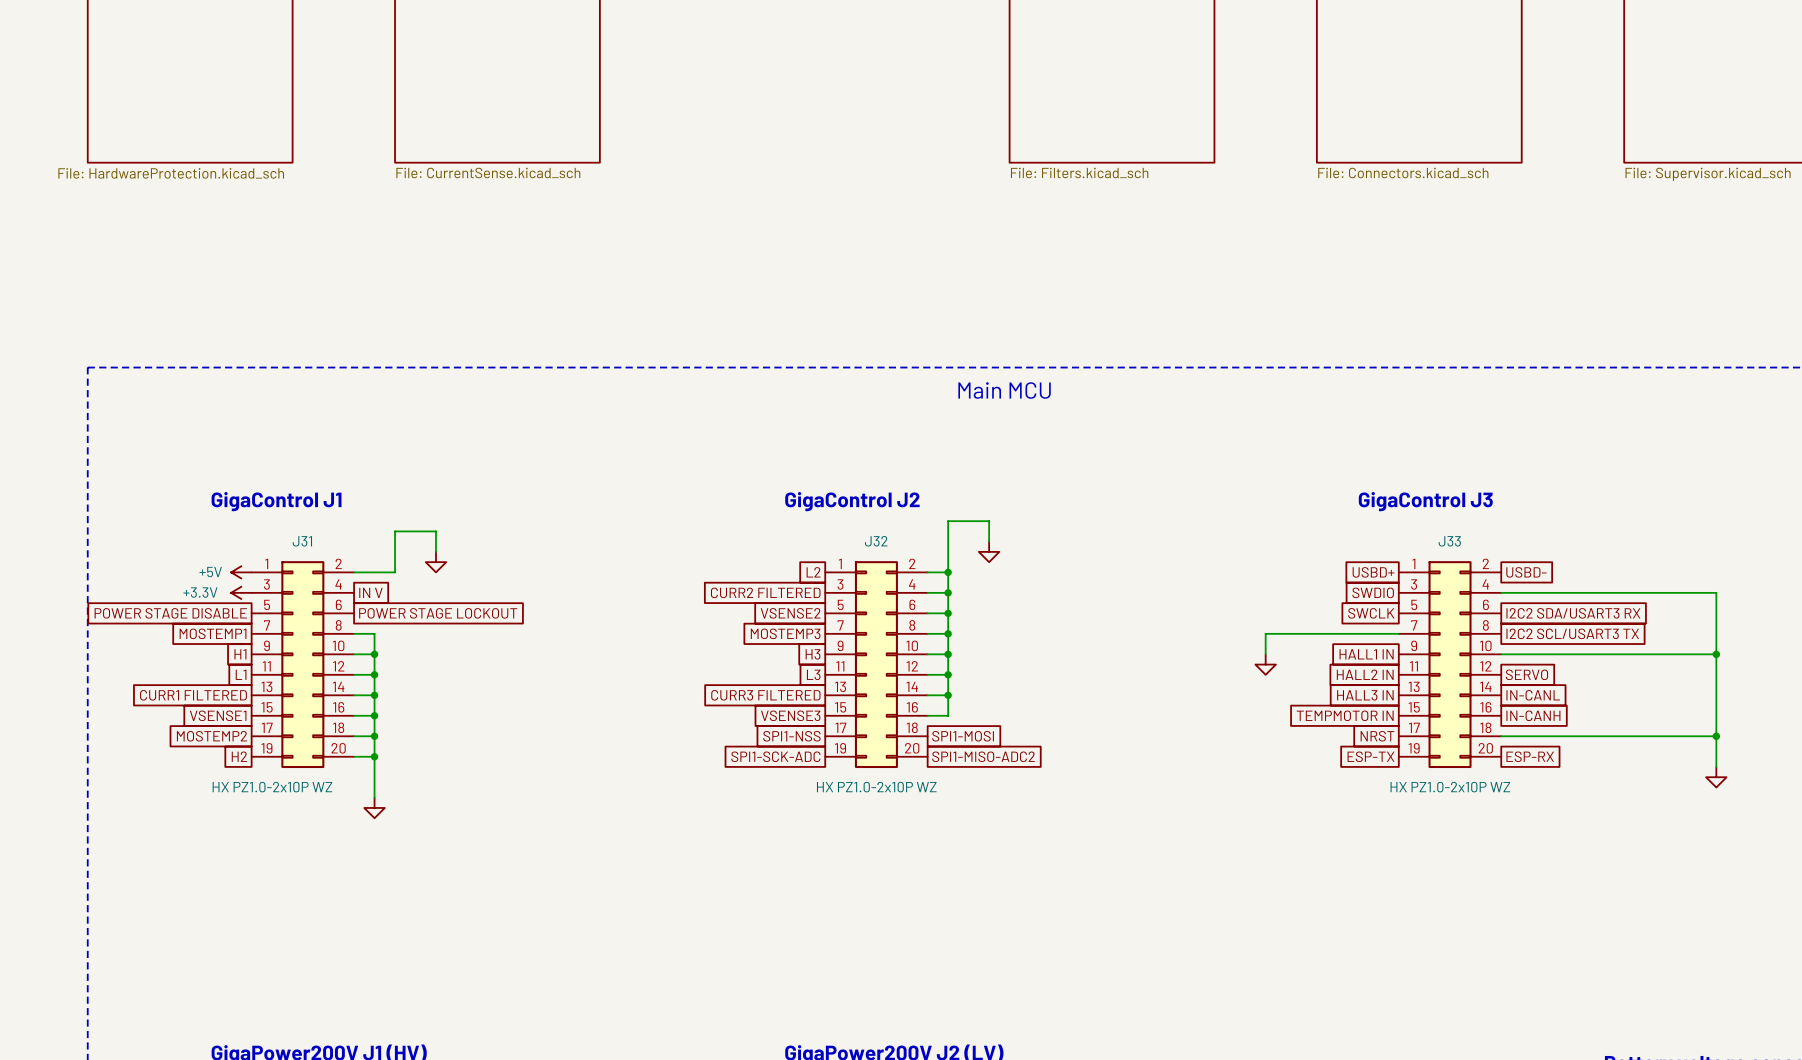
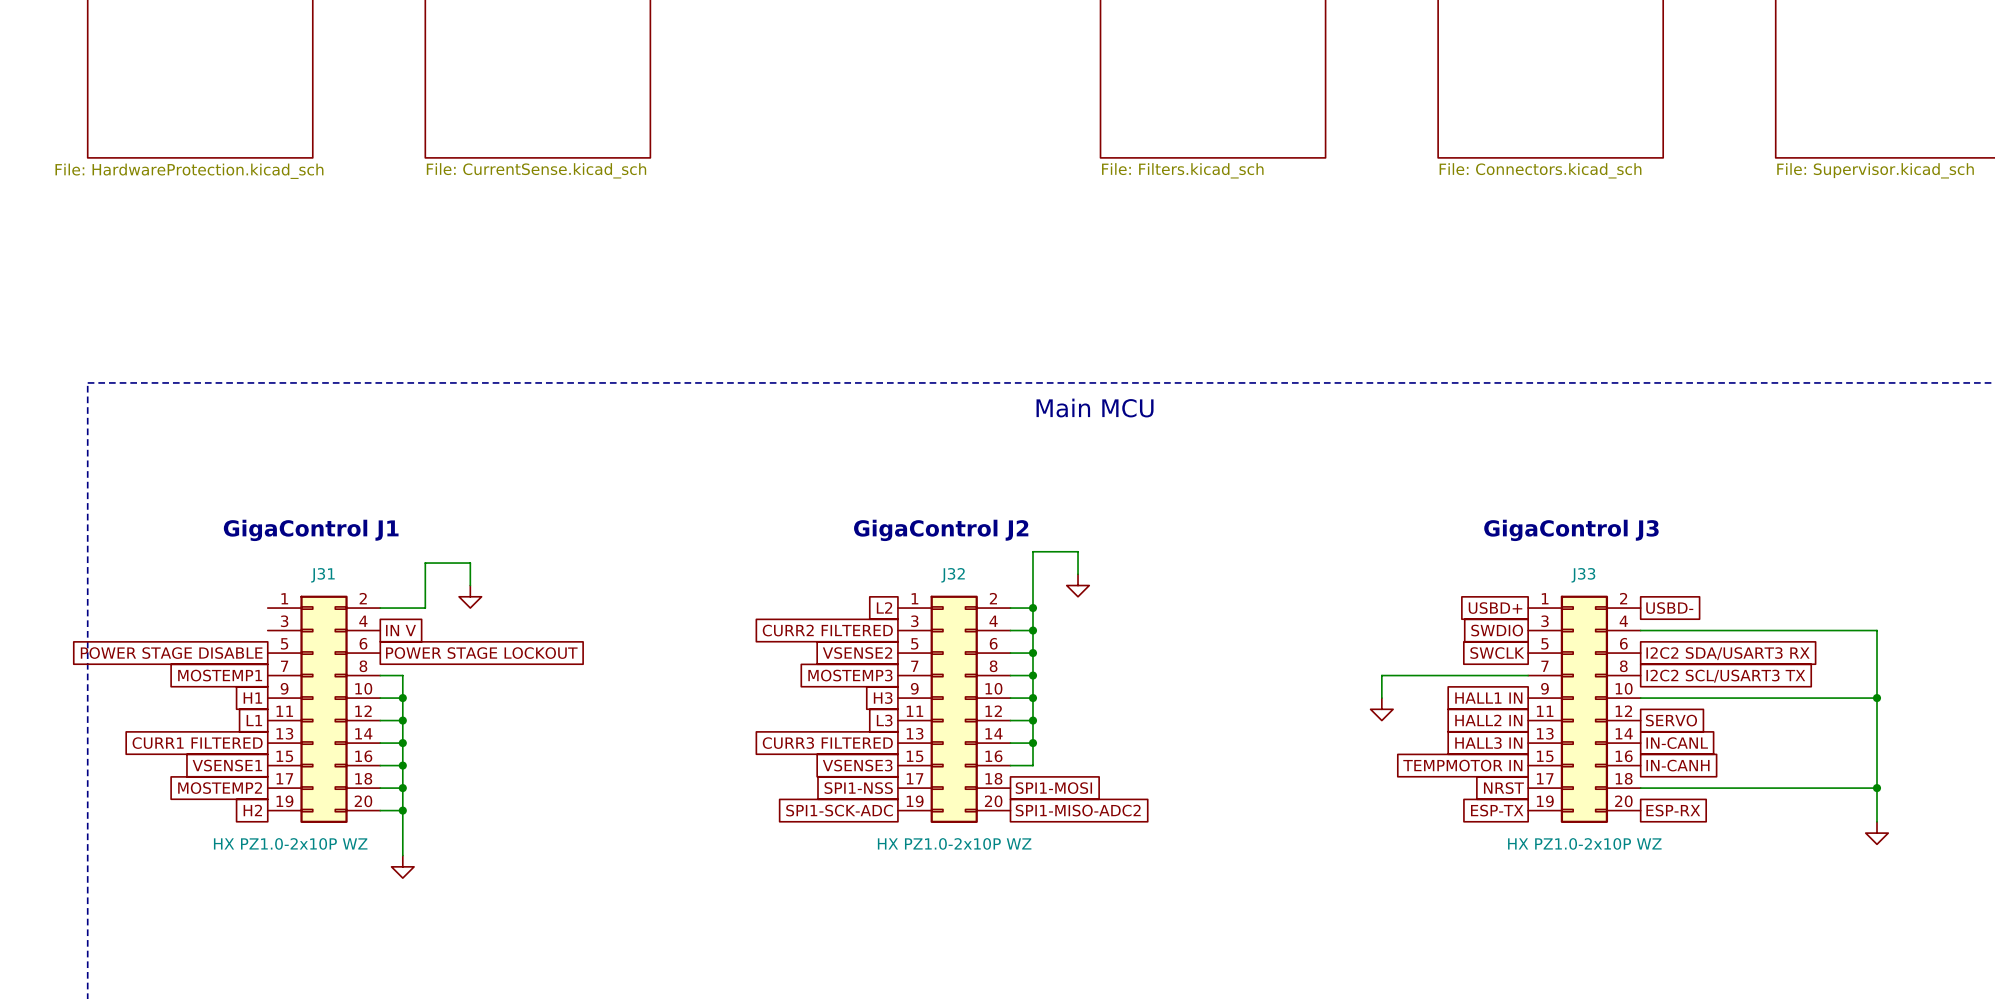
power symbol: +5V (241, 572) -> none
power symbol: +3.3V (241, 592) -> none

